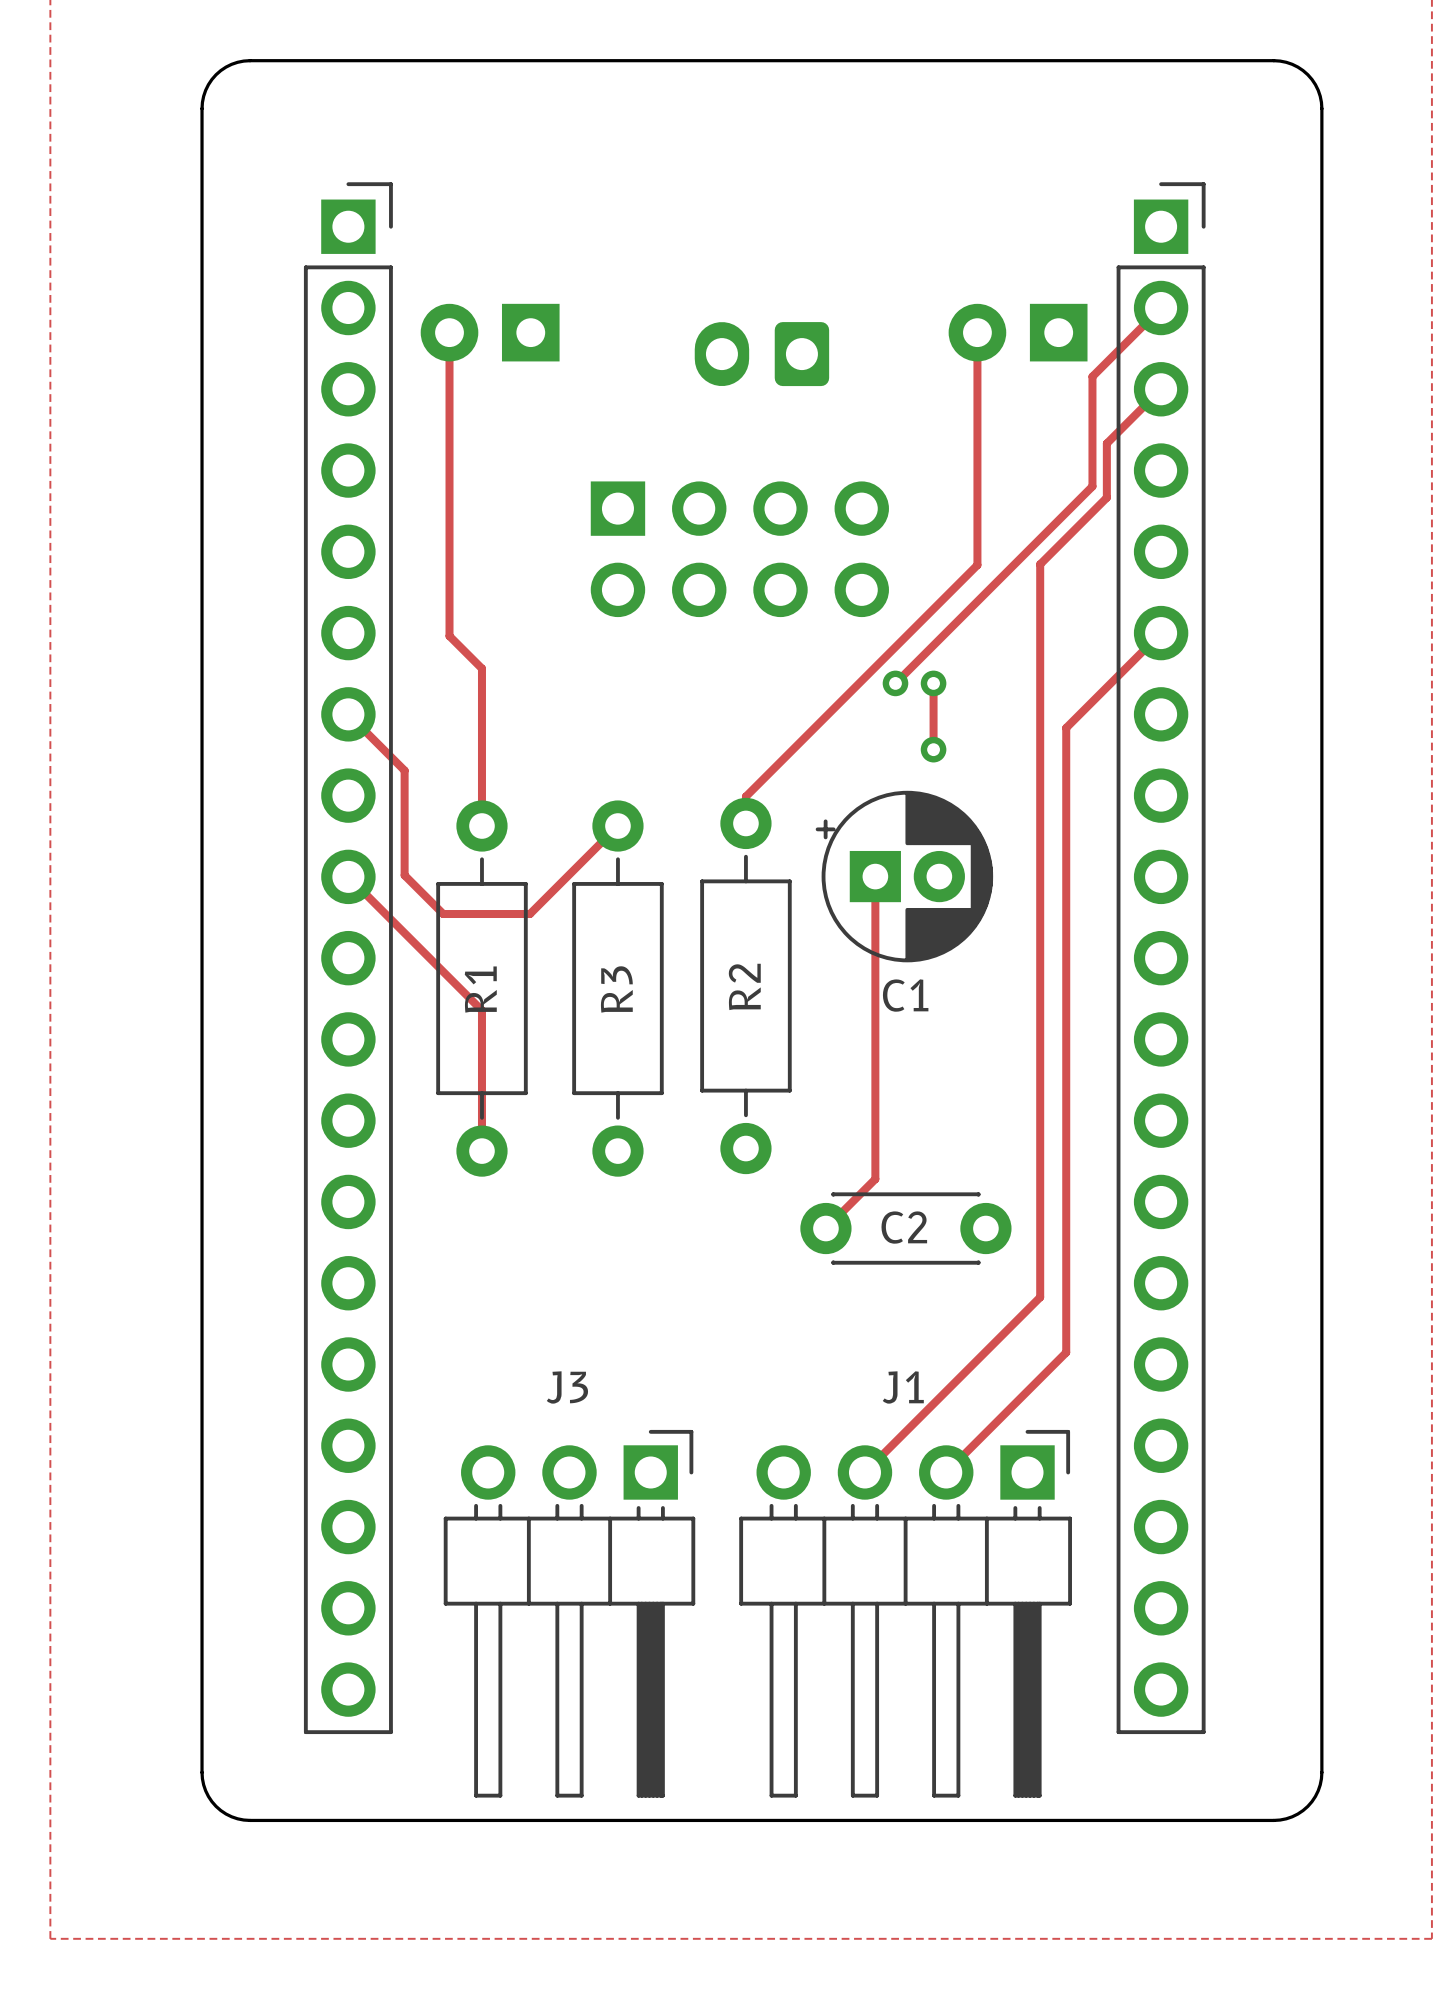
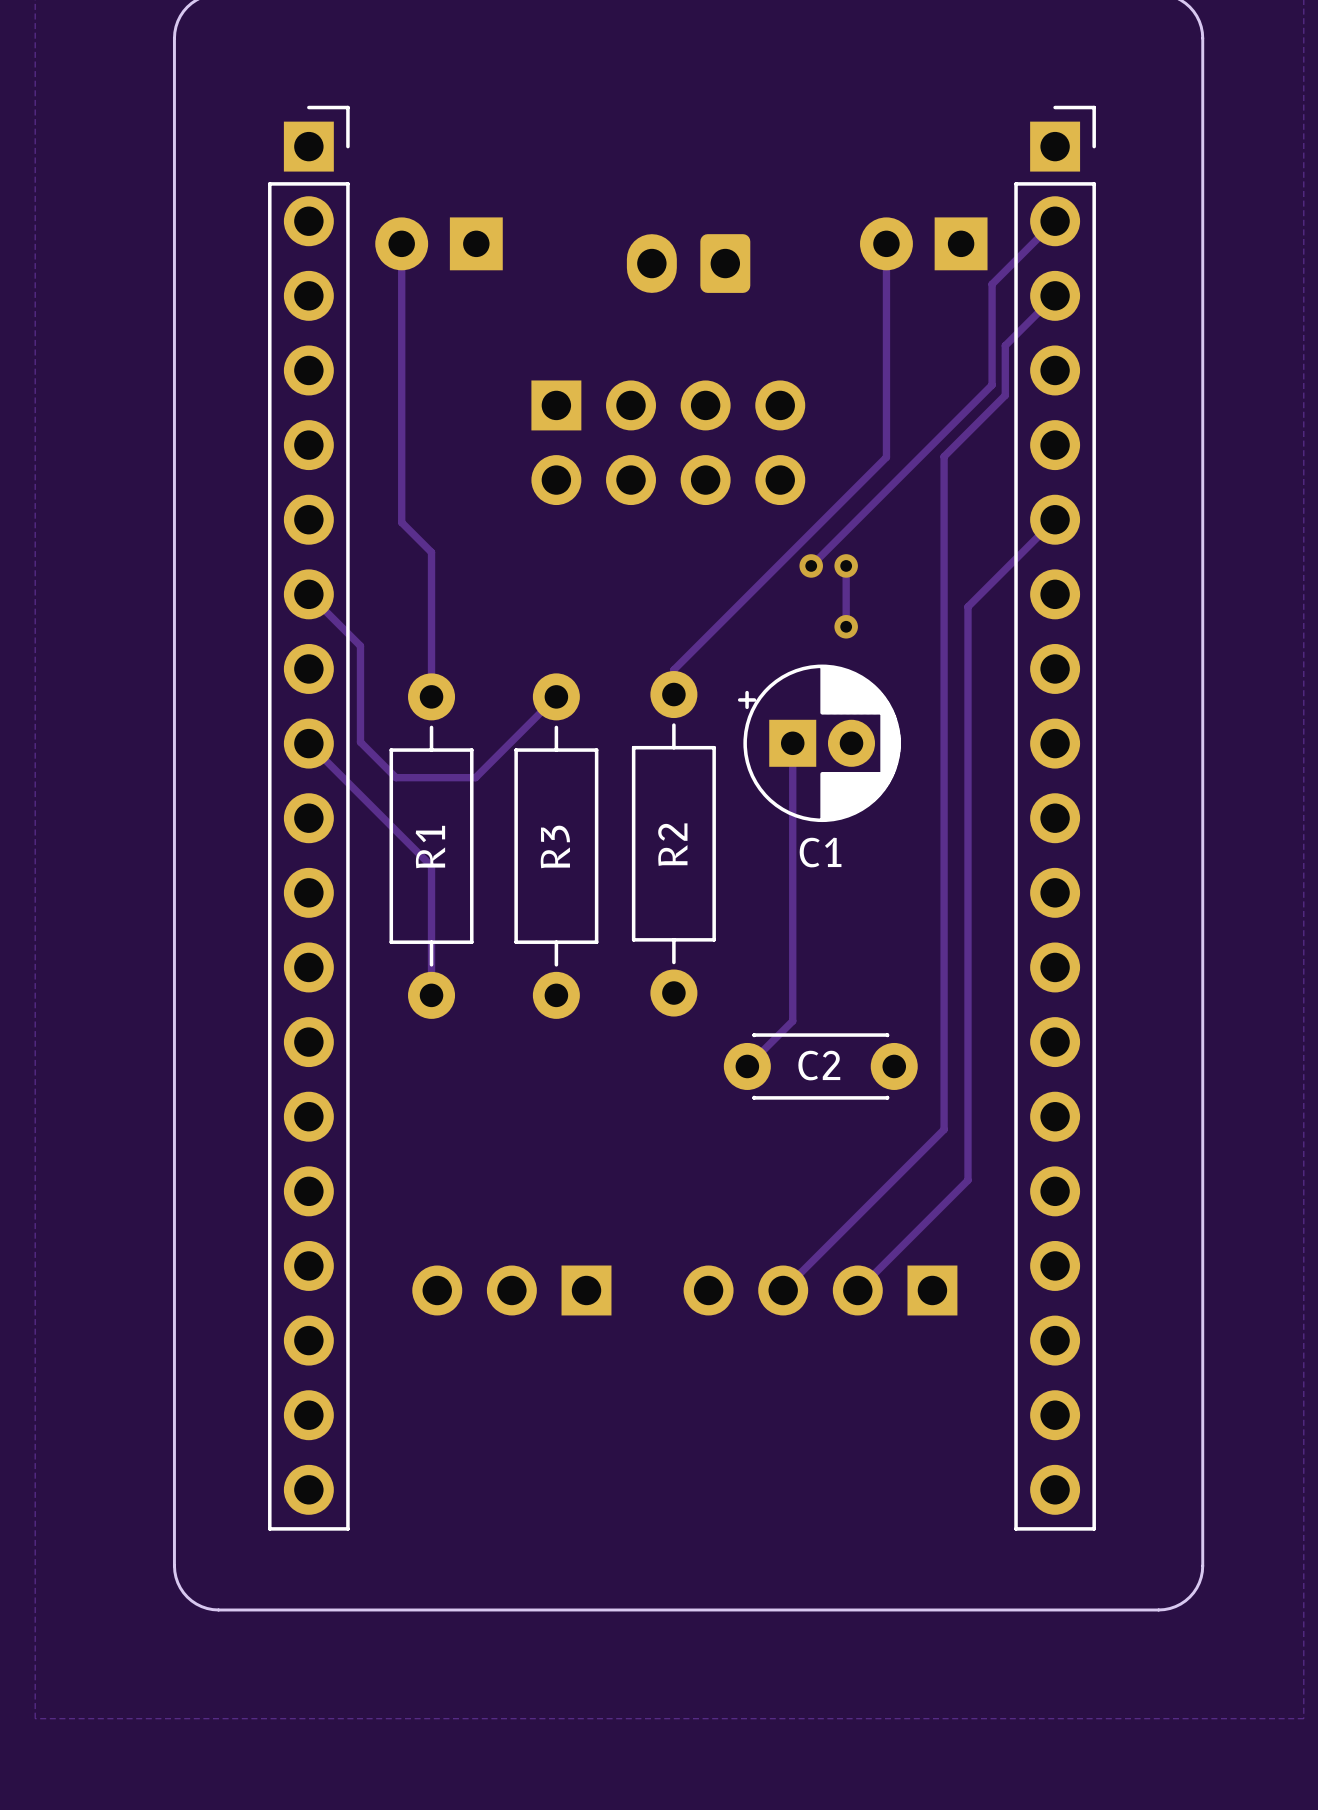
J3 side: top (569, 1613) -> bottom (511, 1290)
J1 side: top (905, 1613) -> bottom (820, 1290)

